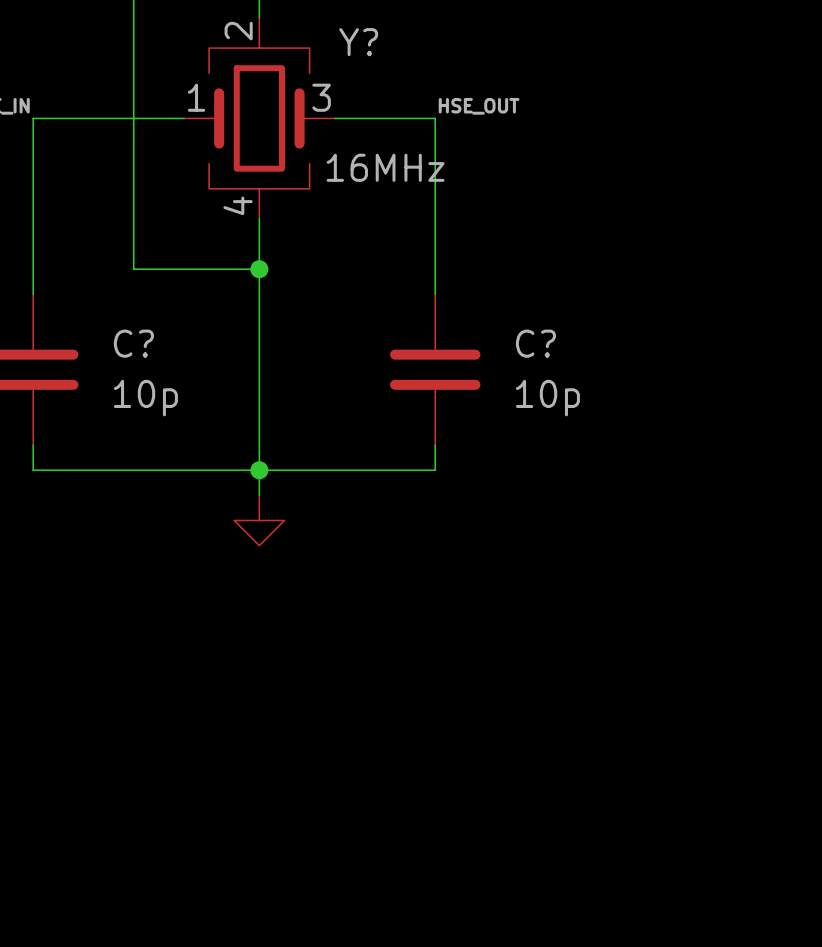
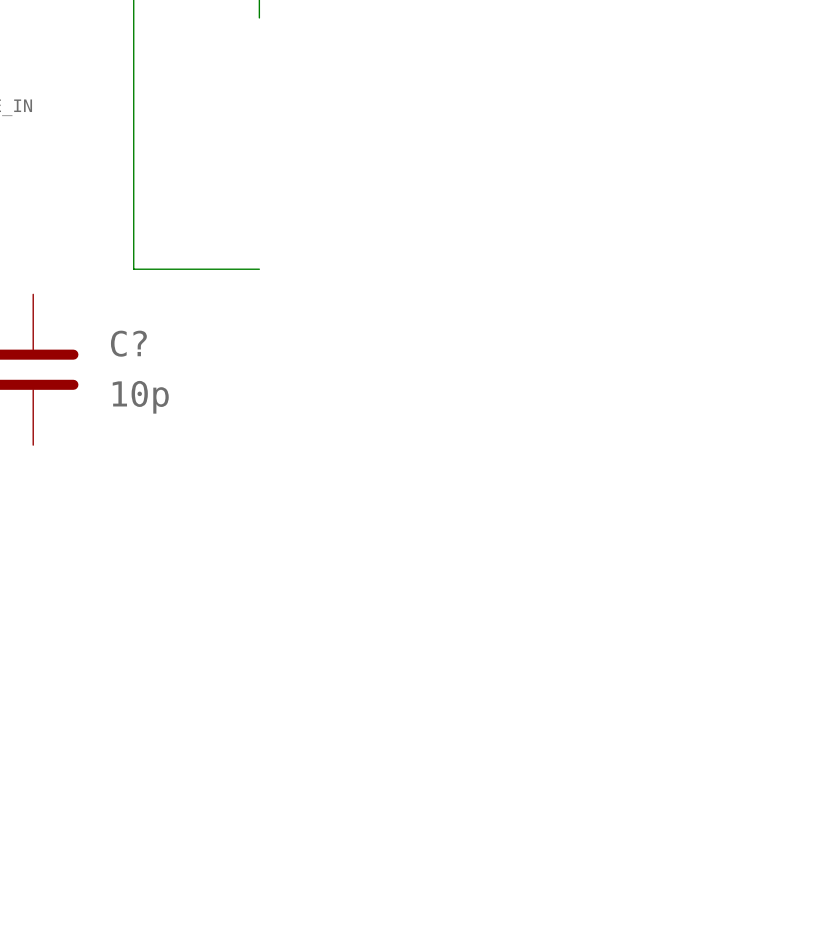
label: HSE_OUT (479, 106) -> none
wire: (183, 118) (33, 118) (33, 294) -> none
Y?: 16MHz (259, 118) -> none
wire: (334, 118) (435, 118) (435, 294) -> none
wire: (259, 218) (259, 495) -> none
junction: (259, 269) -> none
C?: 10p (435, 369) -> none
wire: (33, 445) (33, 470) (435, 470) (435, 445) -> none
junction: (259, 470) -> none
power symbol: (259, 520) -> none

